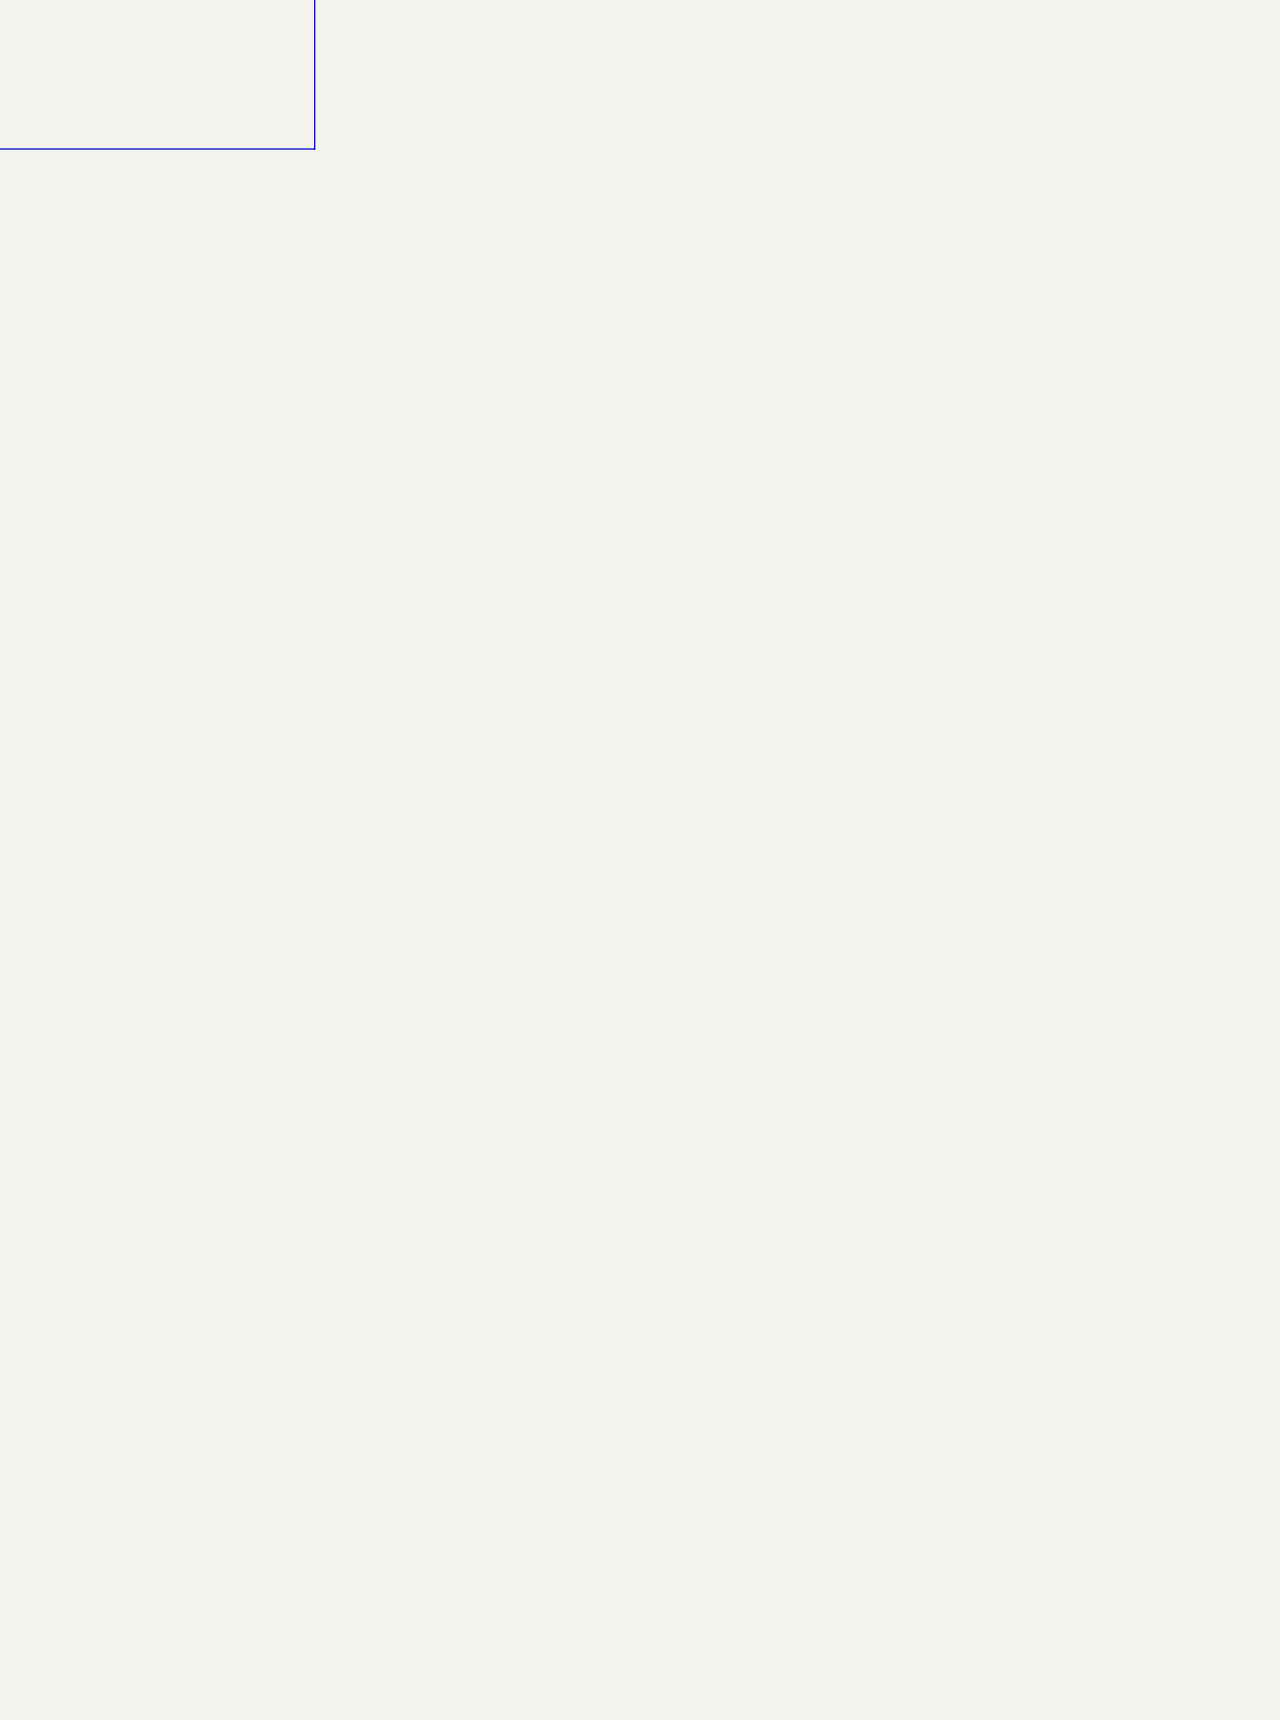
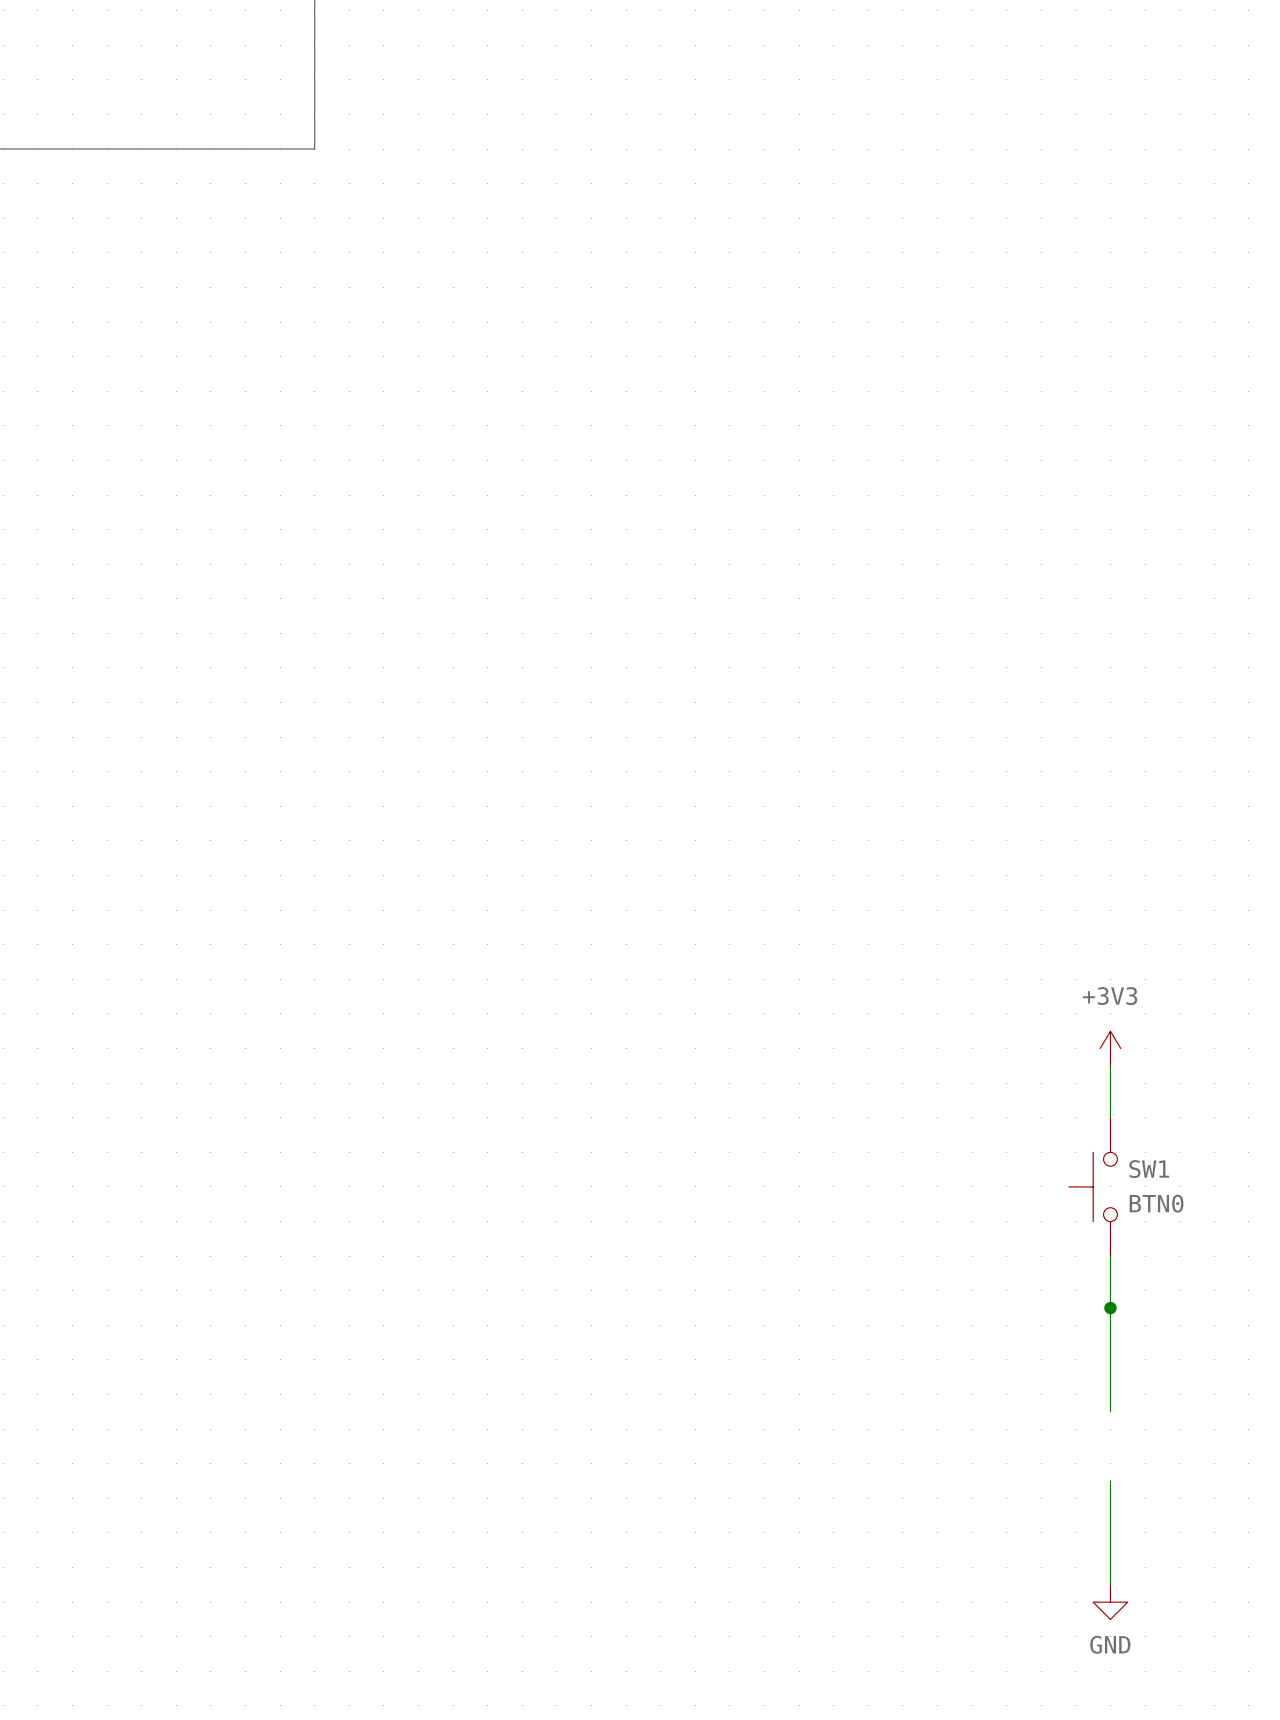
power symbol: none -> +3V3 (1110, 1048)
wire: none -> (1110, 1065) (1110, 1117)
SW1: none -> BTN0 (1093, 1186)
wire: none -> (1110, 1256) (1110, 1411)
junction: none -> (1110, 1308)
wire: none -> (1110, 1481) (1110, 1584)
power symbol: none -> GND (1110, 1602)

